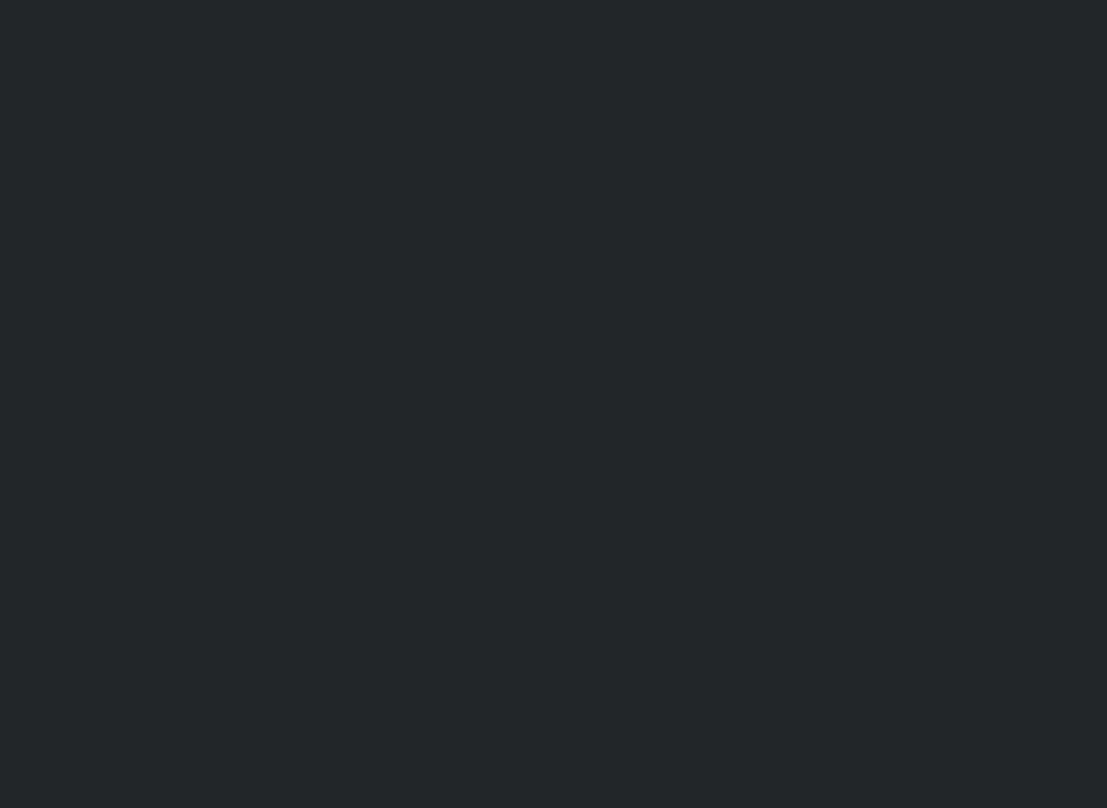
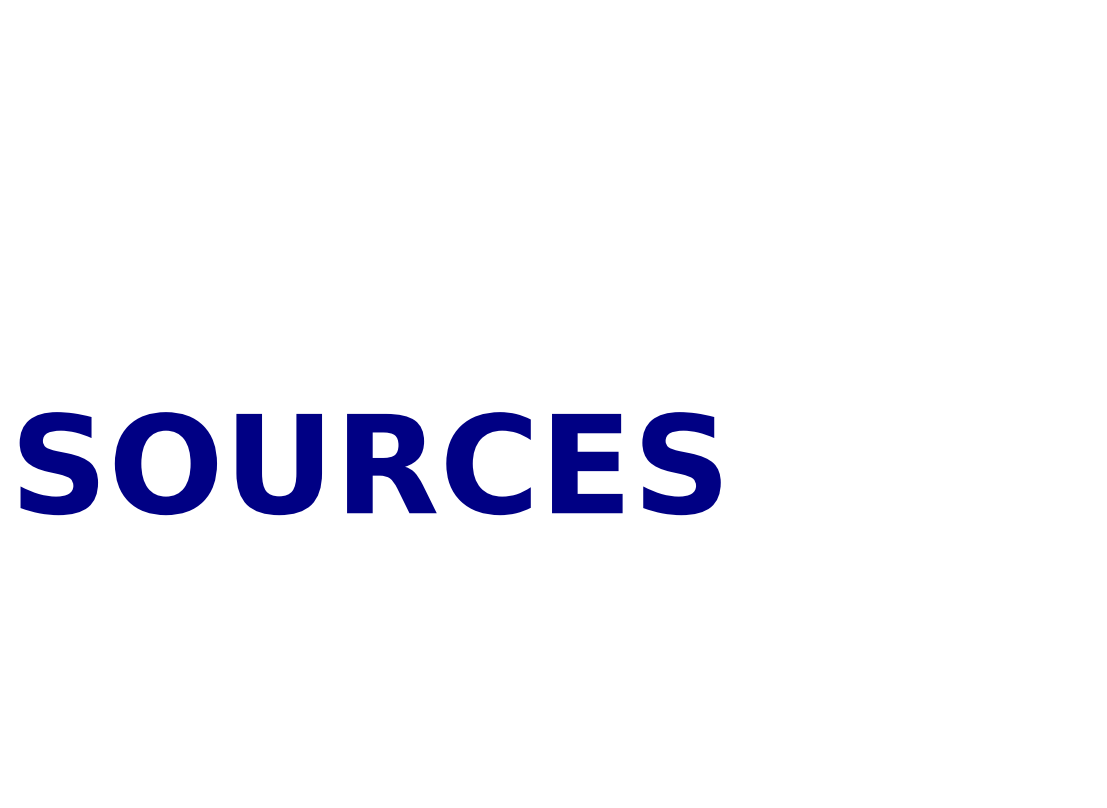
text: none -> SOURCES (370, 463)

